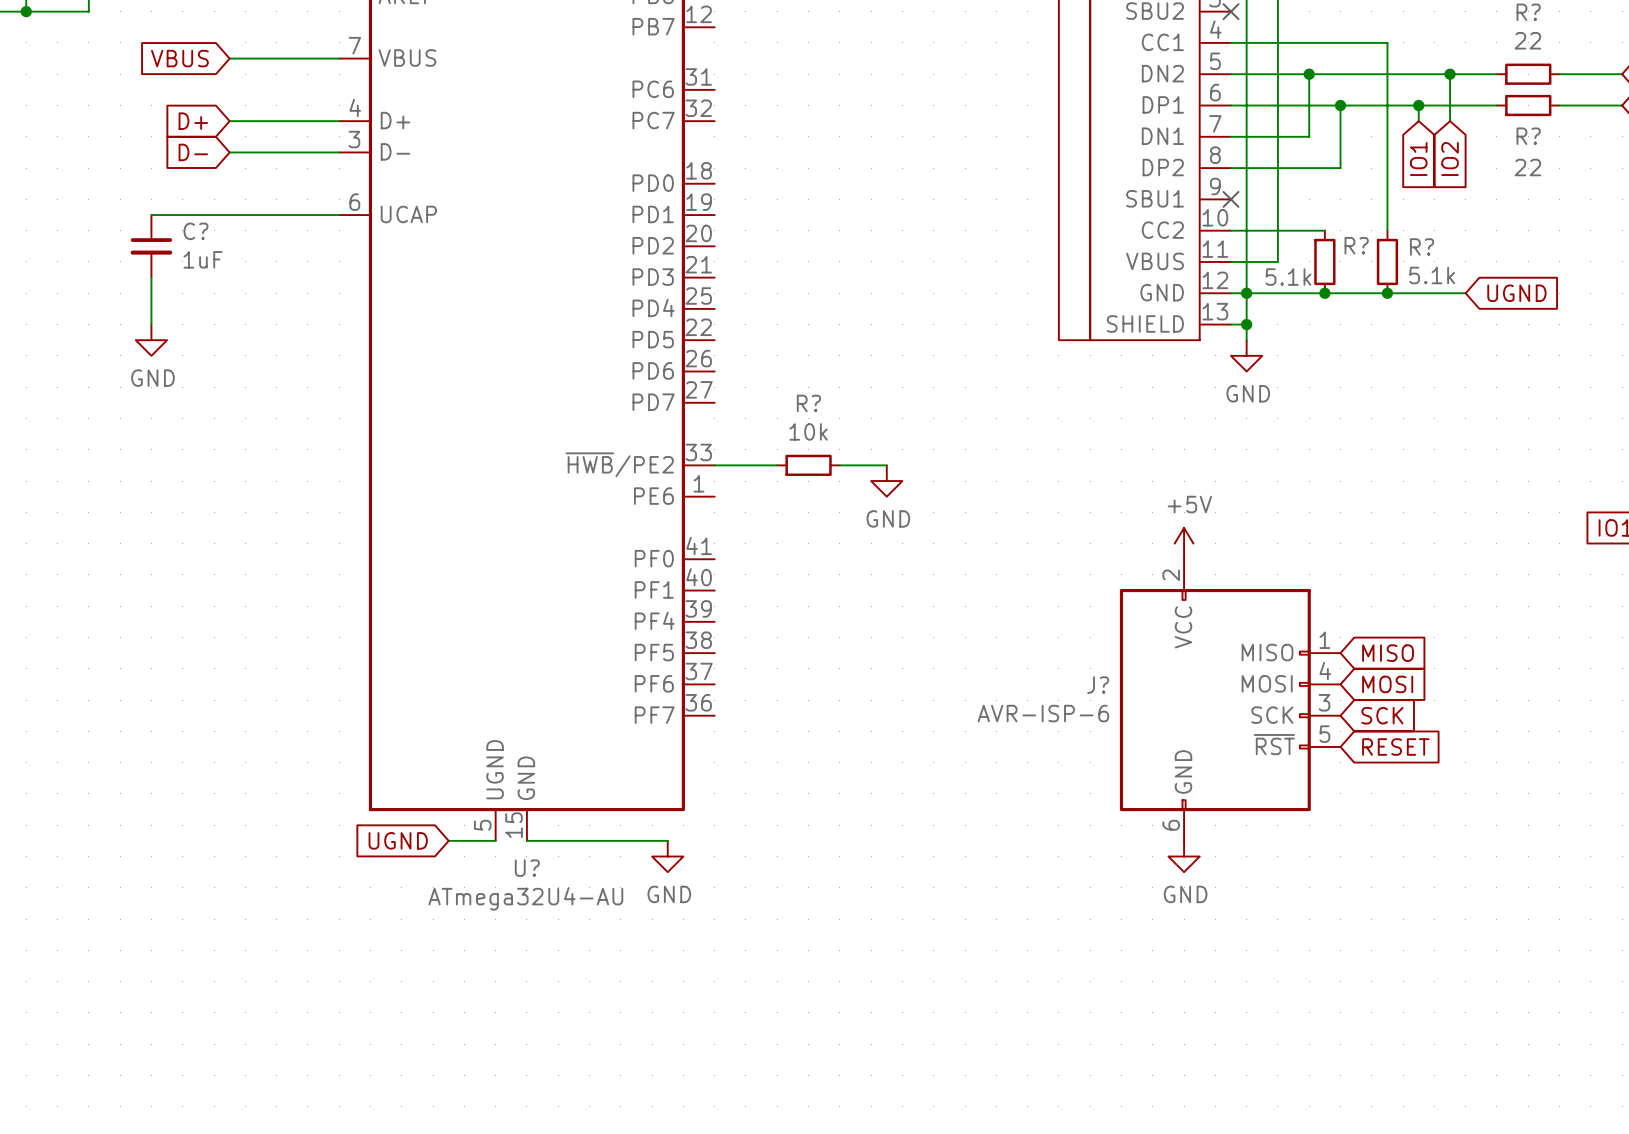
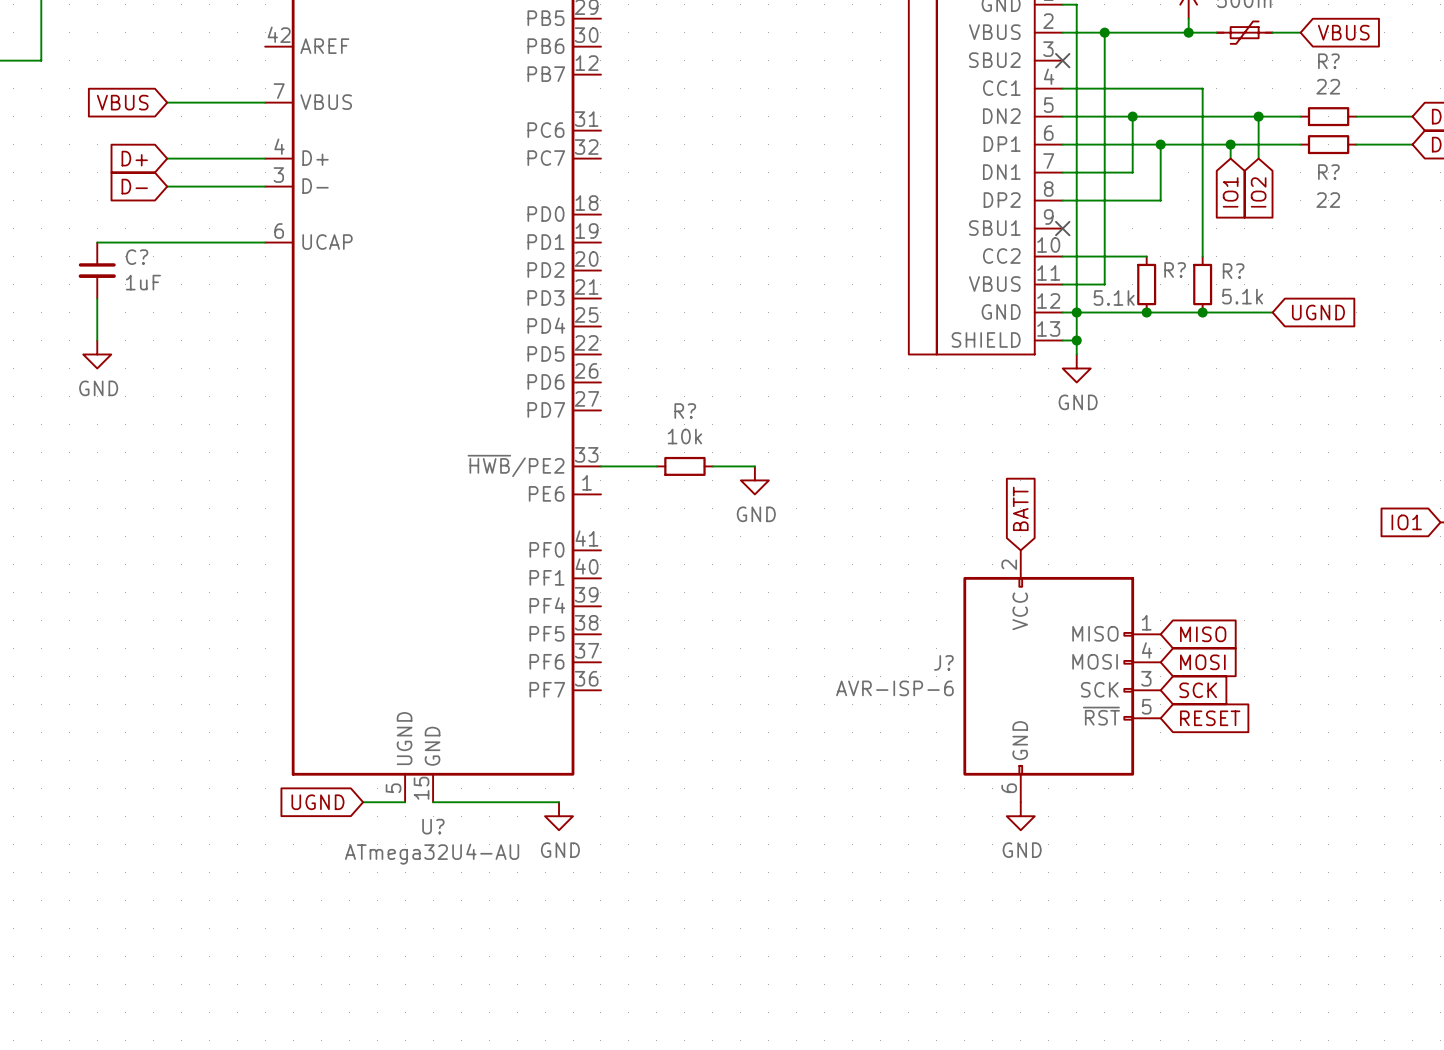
global label: none -> BATT (1020, 508)
power symbol: +5V (1184, 543) -> none

